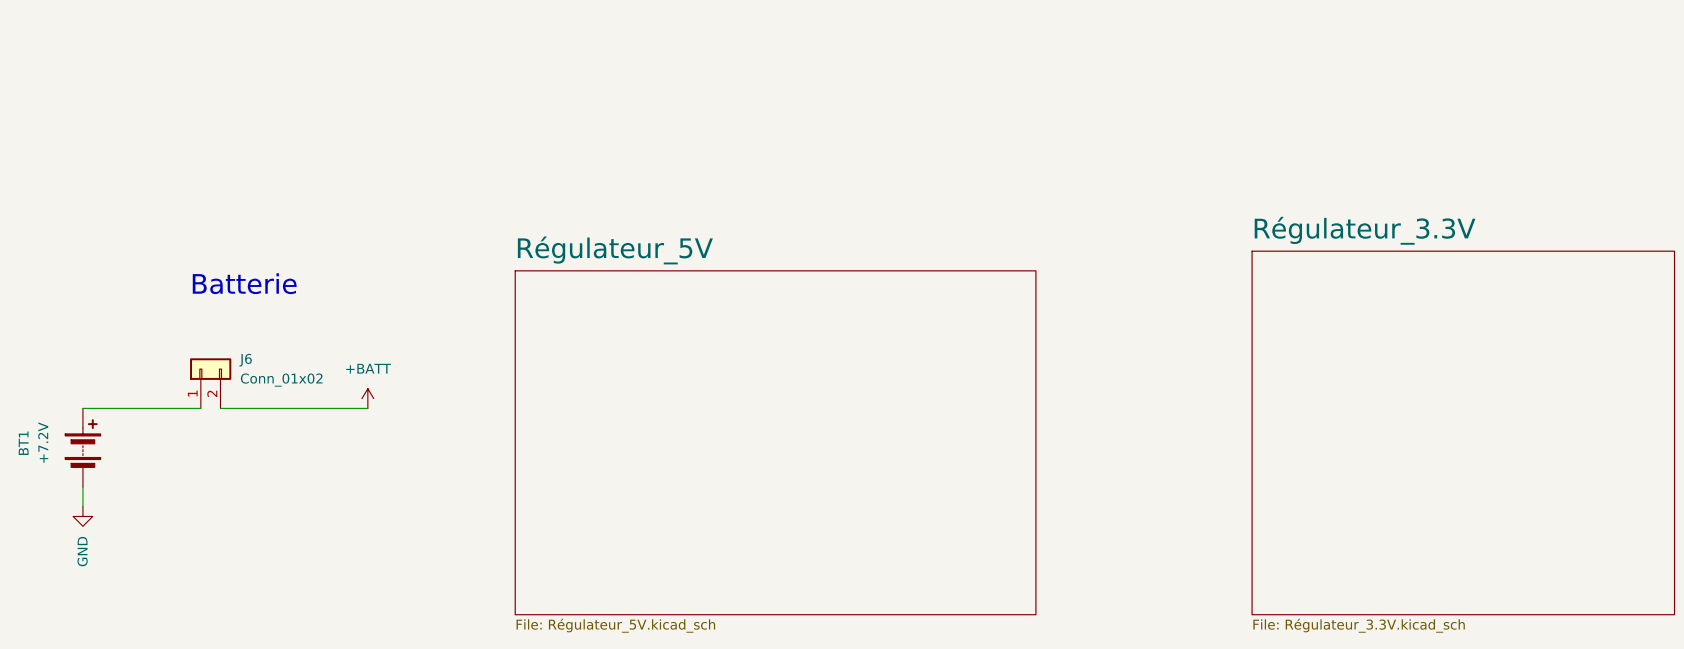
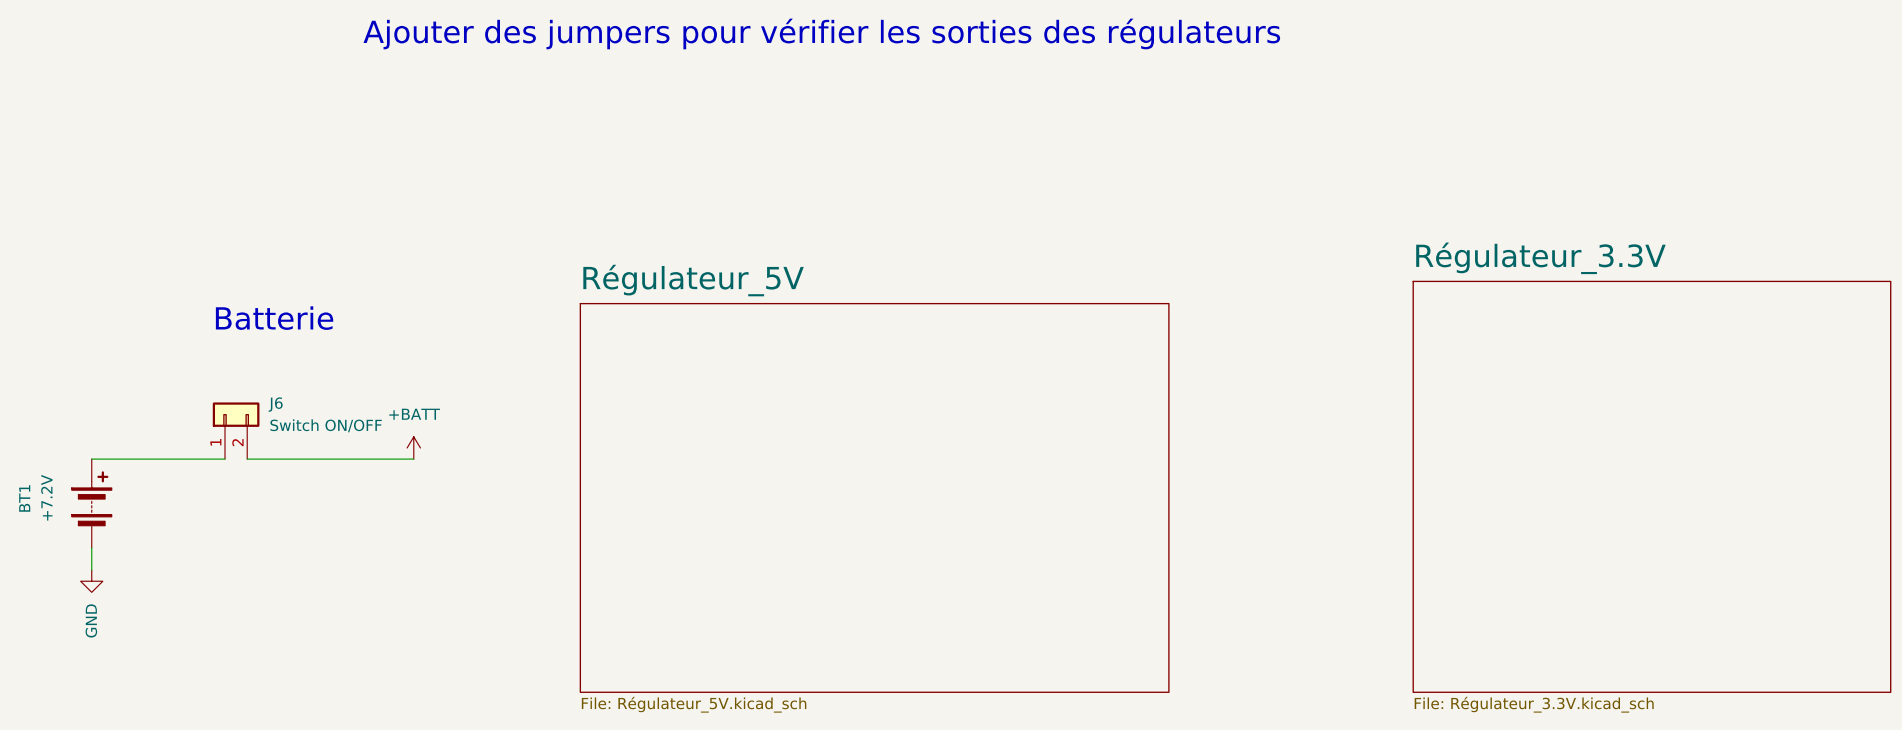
text: none -> Ajouter des jumpers pour vérifier les sorties des régulateurs (821, 33)
J6 value: Conn_01x02 (281, 380) -> Switch ON/OFF (326, 425)

